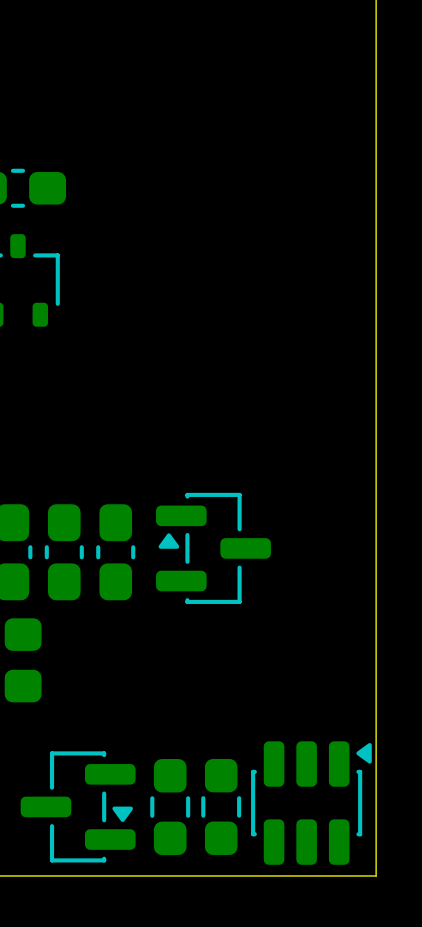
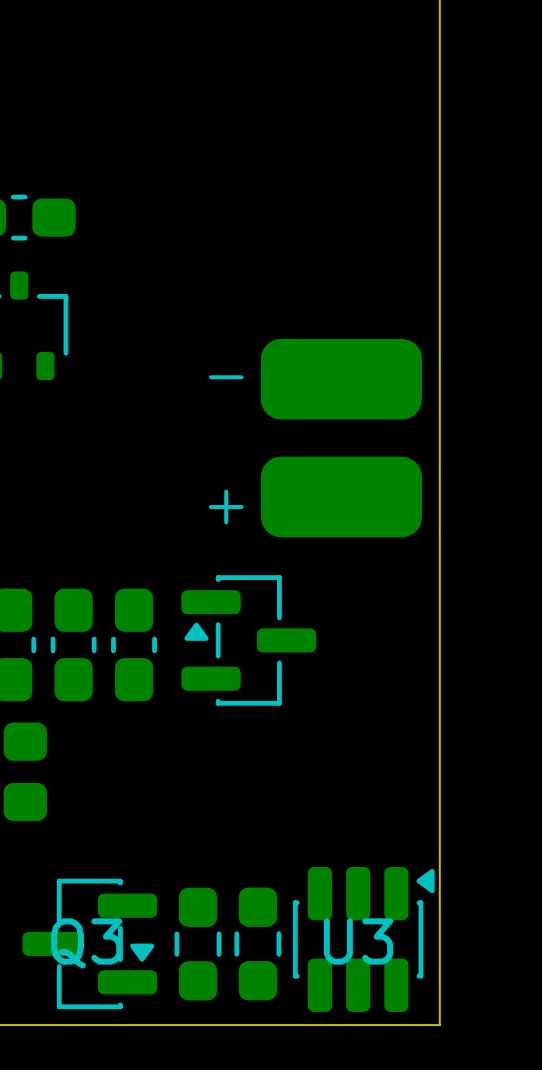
text: none -> - (226, 377)
part: none -> (341, 379)
part: none -> (341, 496)
text: none -> + (226, 506)
U3 name: none -> U3 (358, 941)
Q3 name: none -> Q3 (86, 943)

